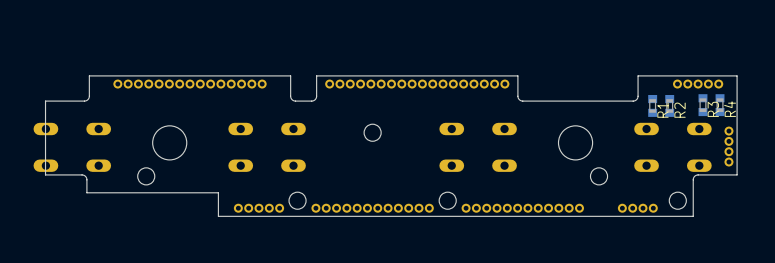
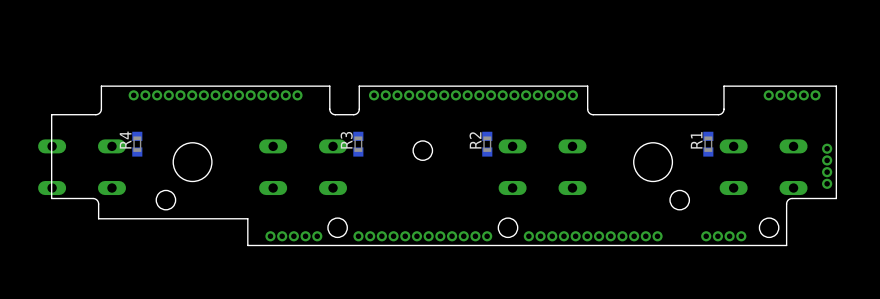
R1 position: (652, 105) -> (708, 144)
R2 position: (669, 105) -> (487, 144)
R3 position: (702, 105) -> (358, 144)
R4 position: (720, 105) -> (137, 144)
R3 name position: R3 (713, 109) -> R3 (346, 140)
R4 name position: R4 (730, 109) -> R4 (125, 140)
R1 name position: R1 (662, 110) -> R1 (696, 140)
R2 name position: R2 (680, 110) -> R2 (475, 140)

